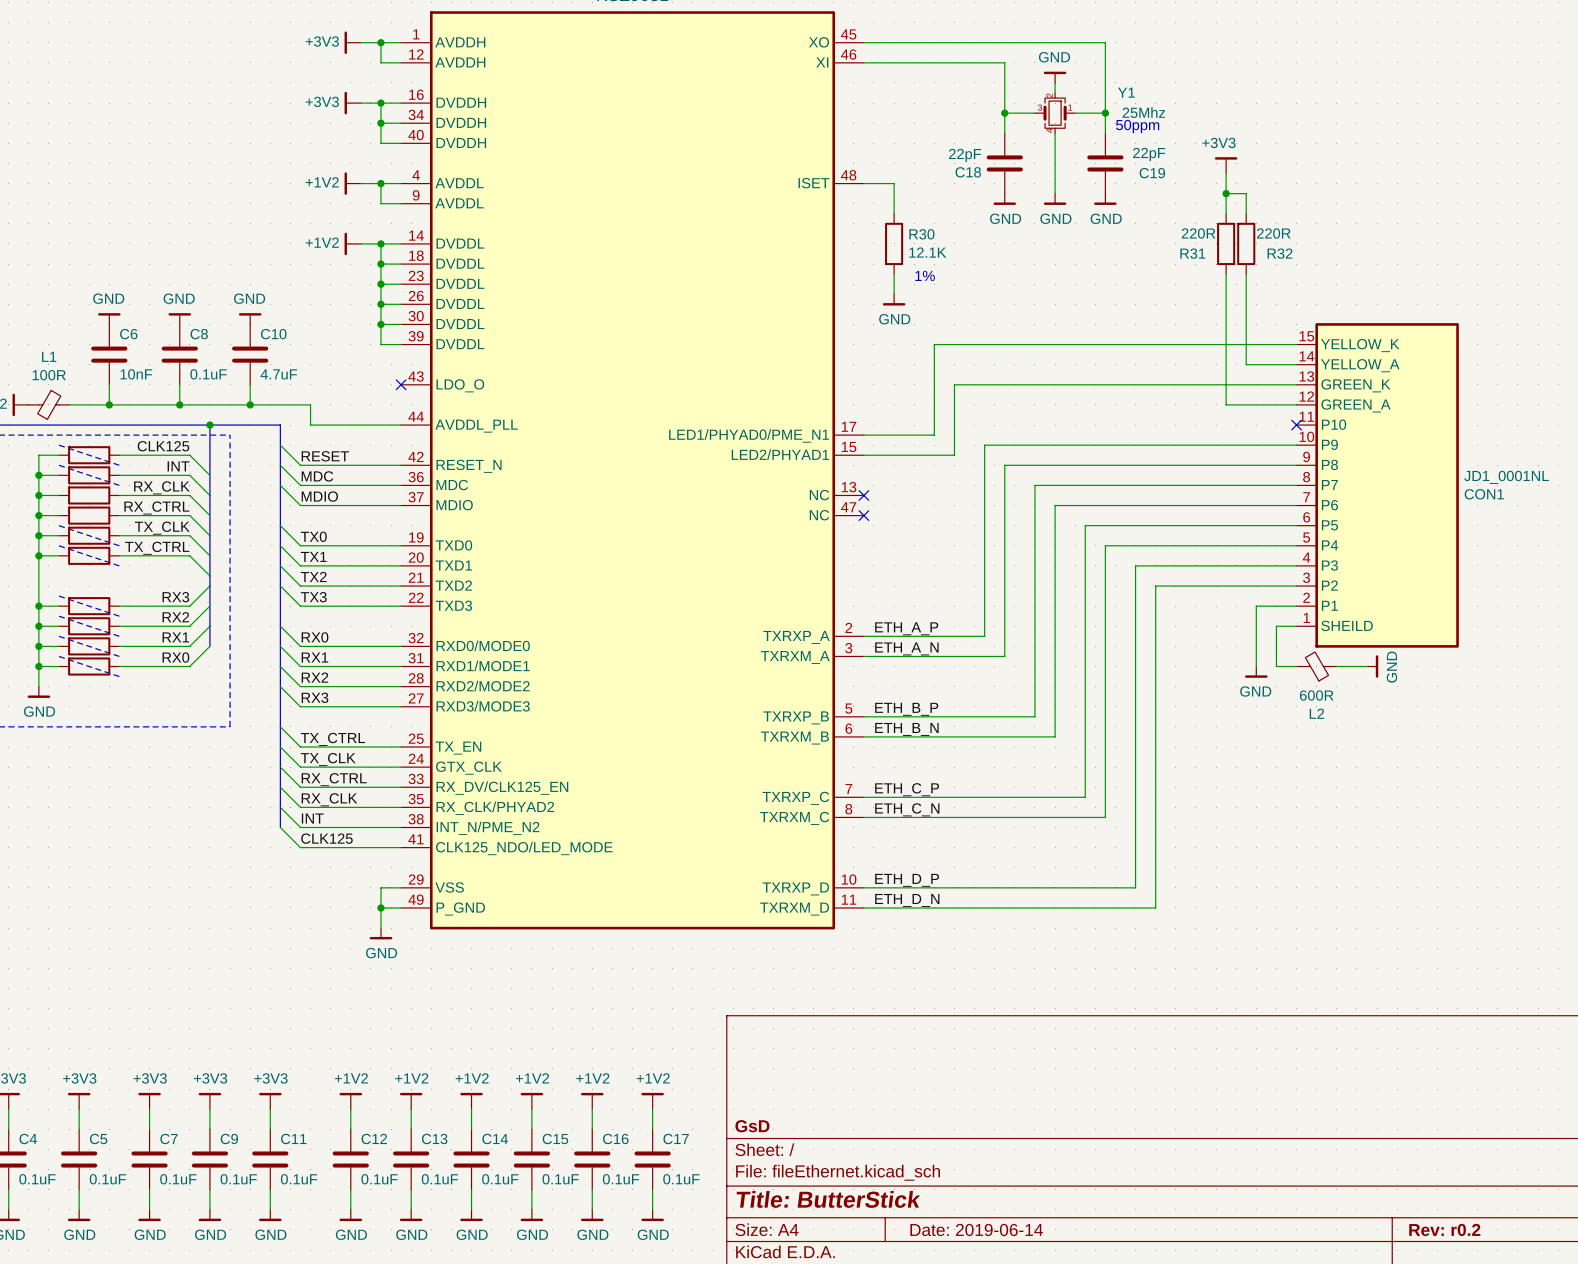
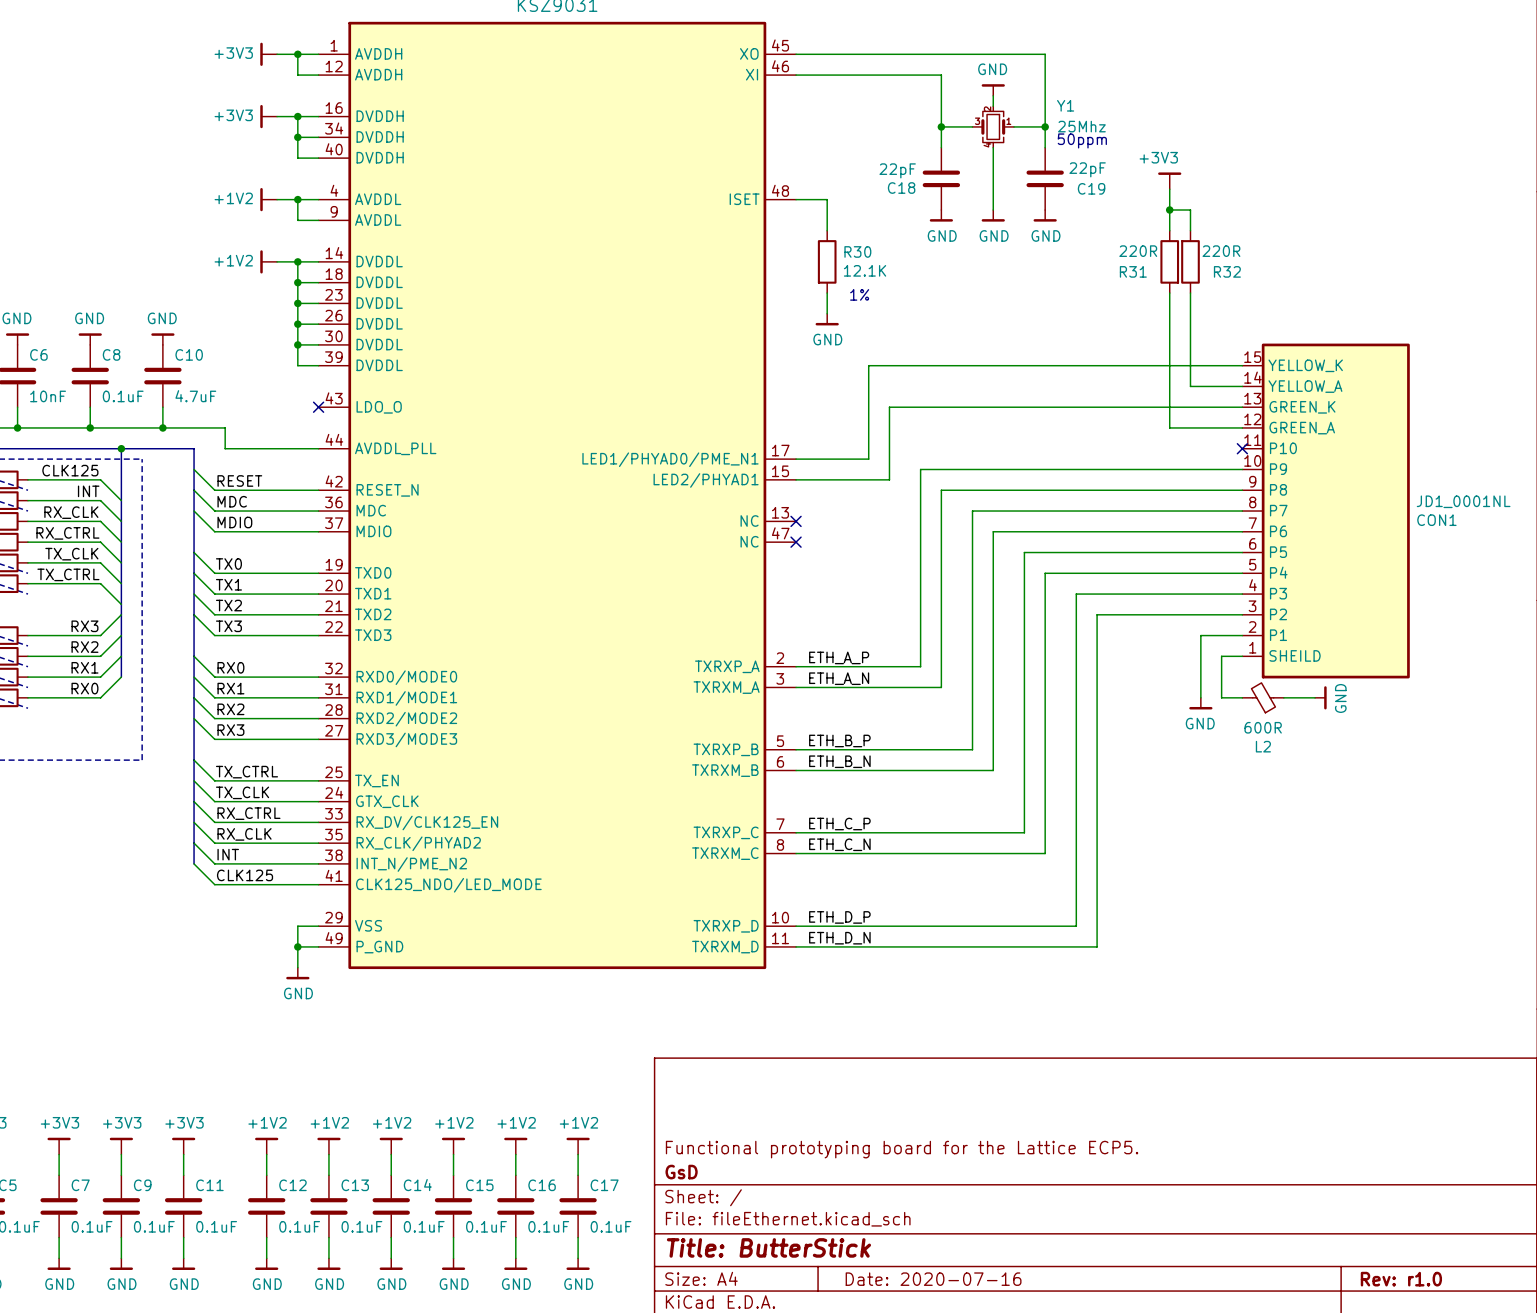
title block: none -> Functional prototyping board for the Lattice ECP5. (902, 1149)
title block: Date: 2019-06-14 (976, 1229) -> Date: 2020-07-16 (933, 1279)
title block: Rev: r0.2 (1444, 1229) -> Rev: r1.0 (1401, 1279)

